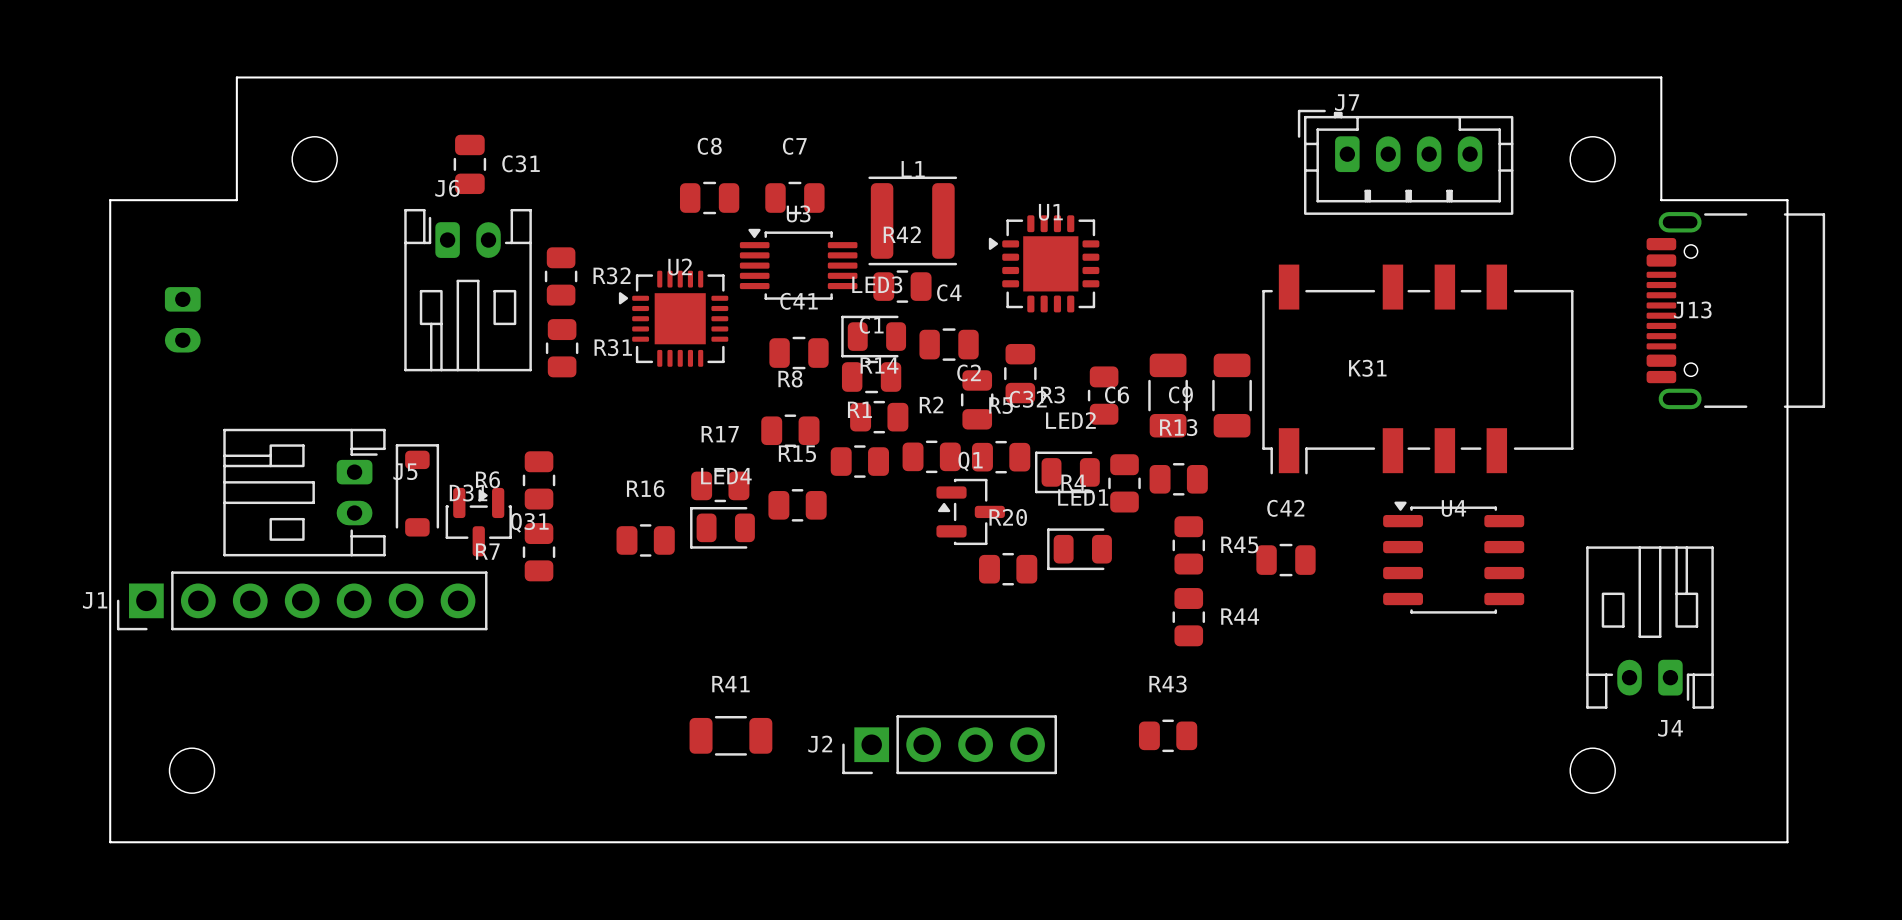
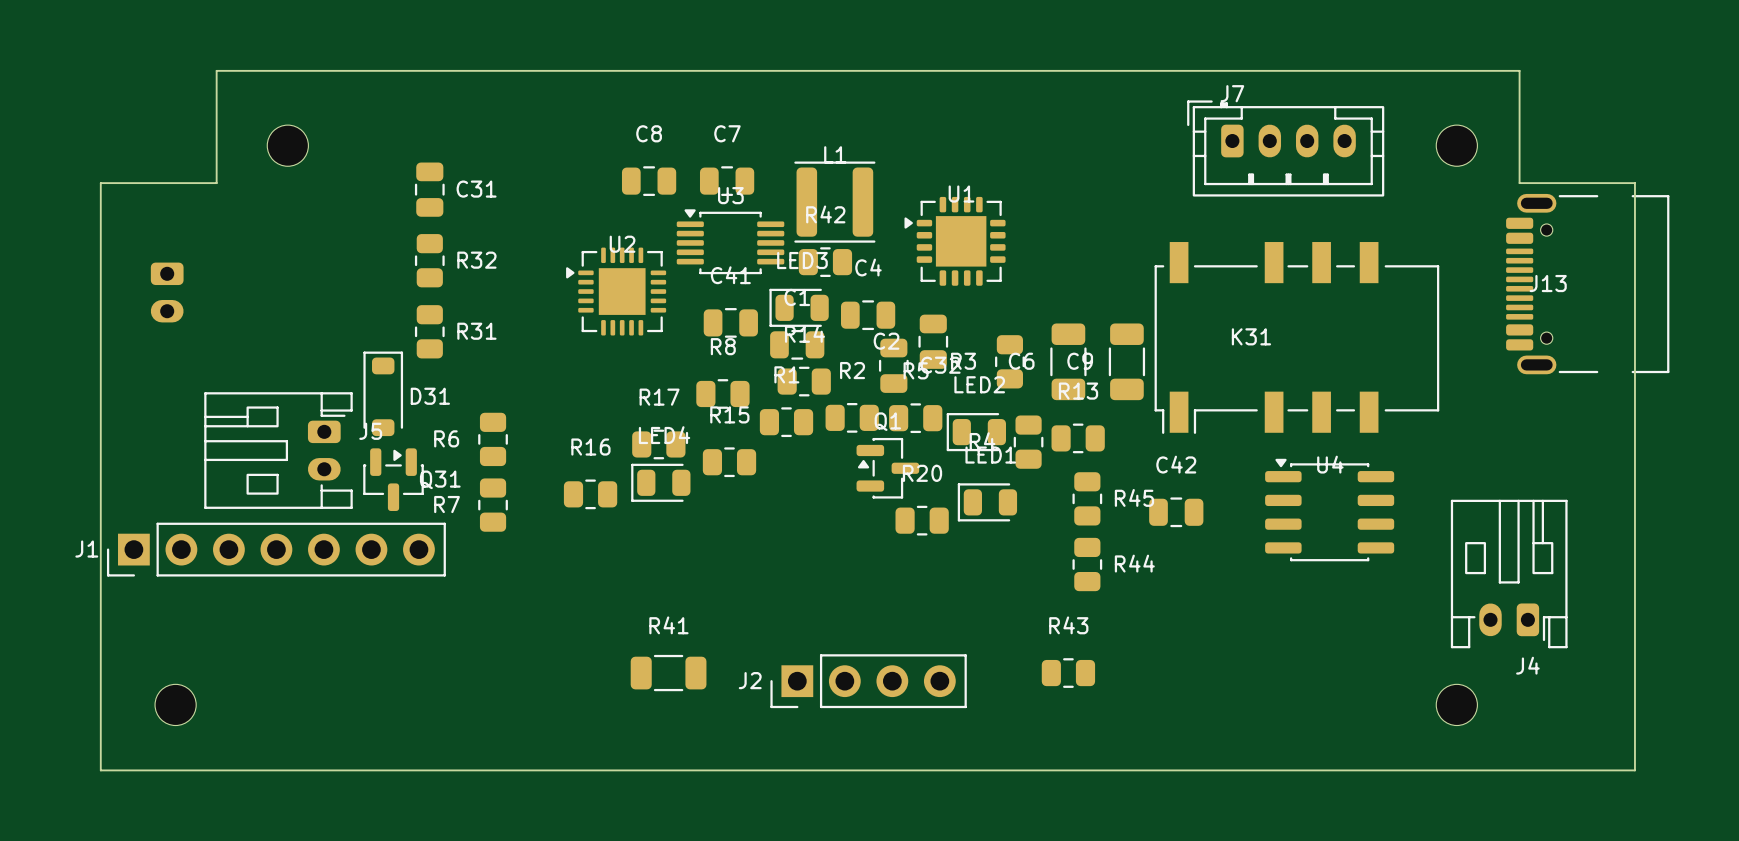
C31 position: (469, 164) -> (429, 189)
R32 position: (561, 276) -> (429, 260)
J6: (468, 290) -> none
R31 position: (562, 348) -> (429, 331)
D31 position: (417, 490) -> (383, 393)
Q31 position: (478, 522) -> (393, 479)

